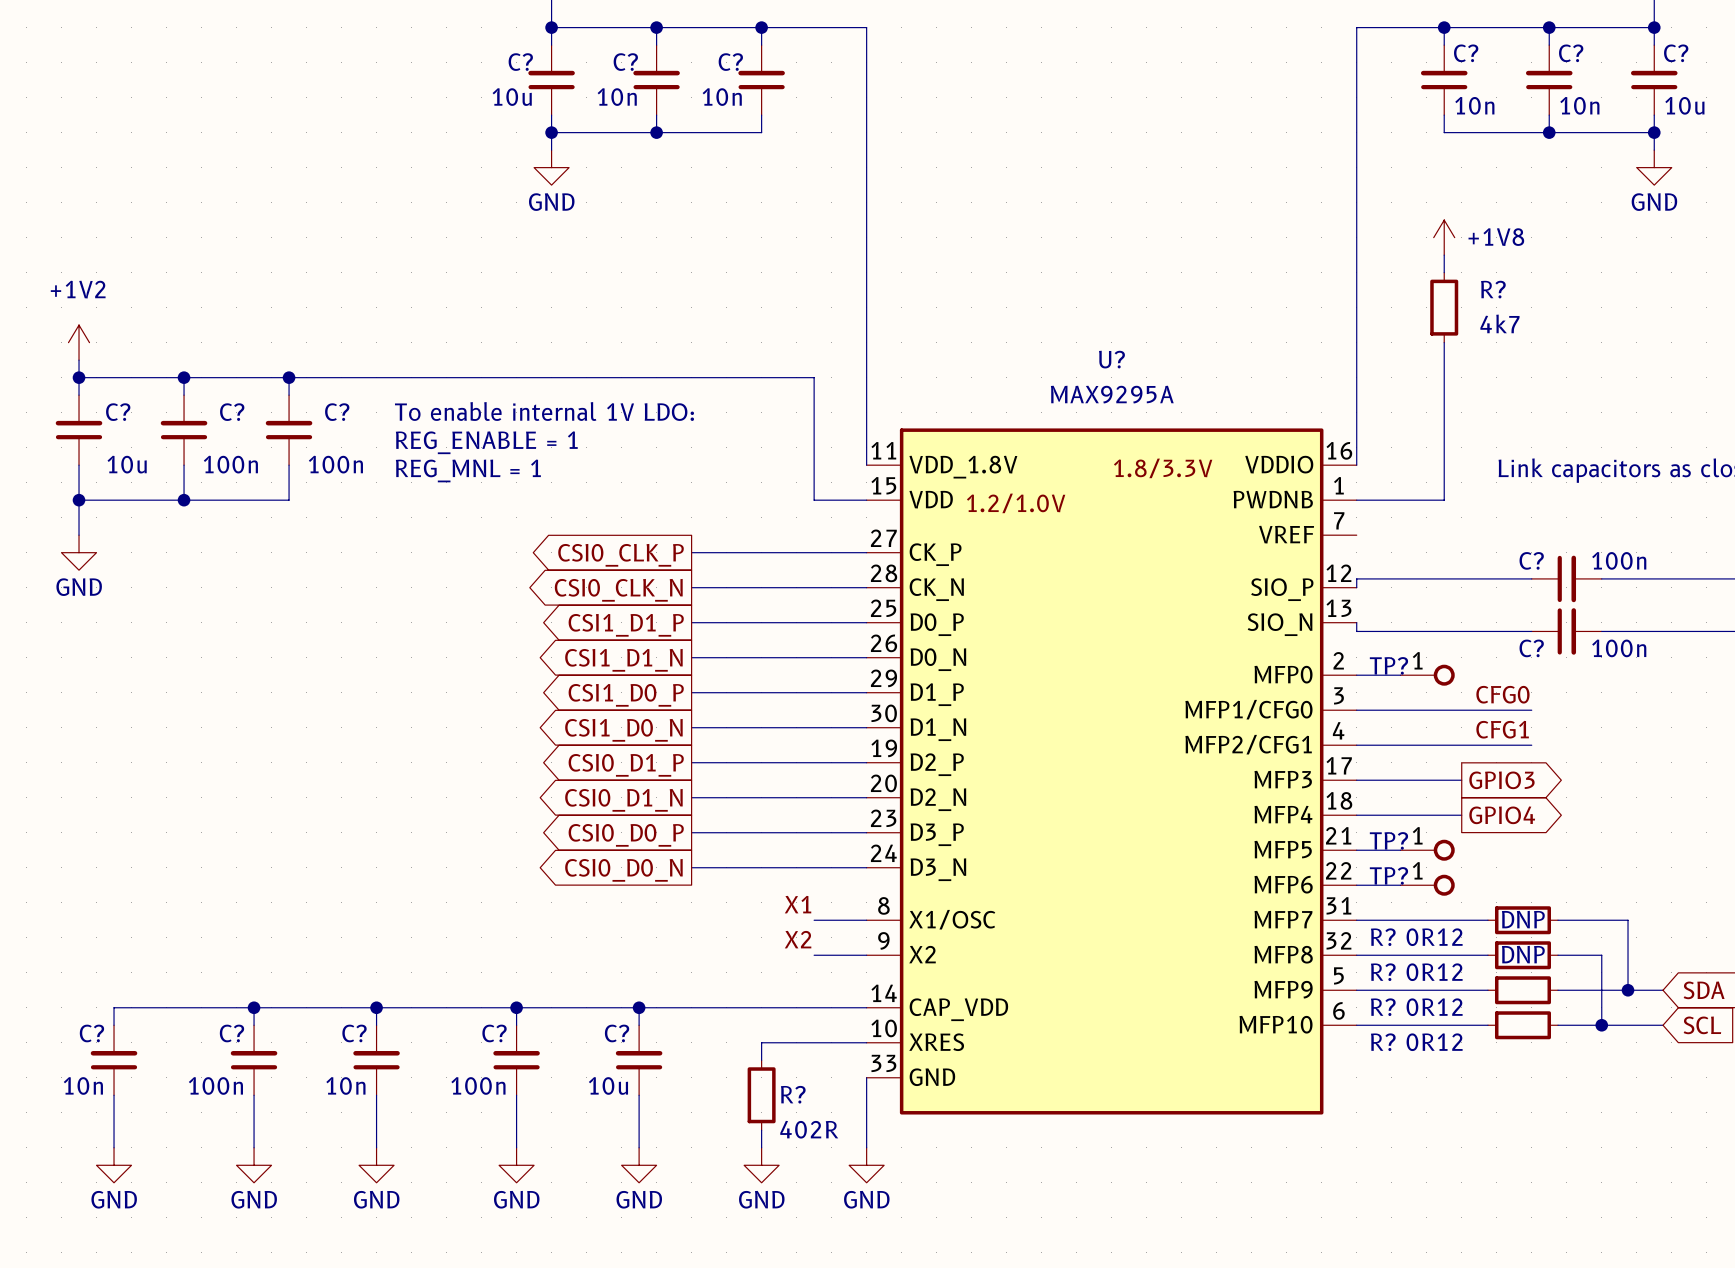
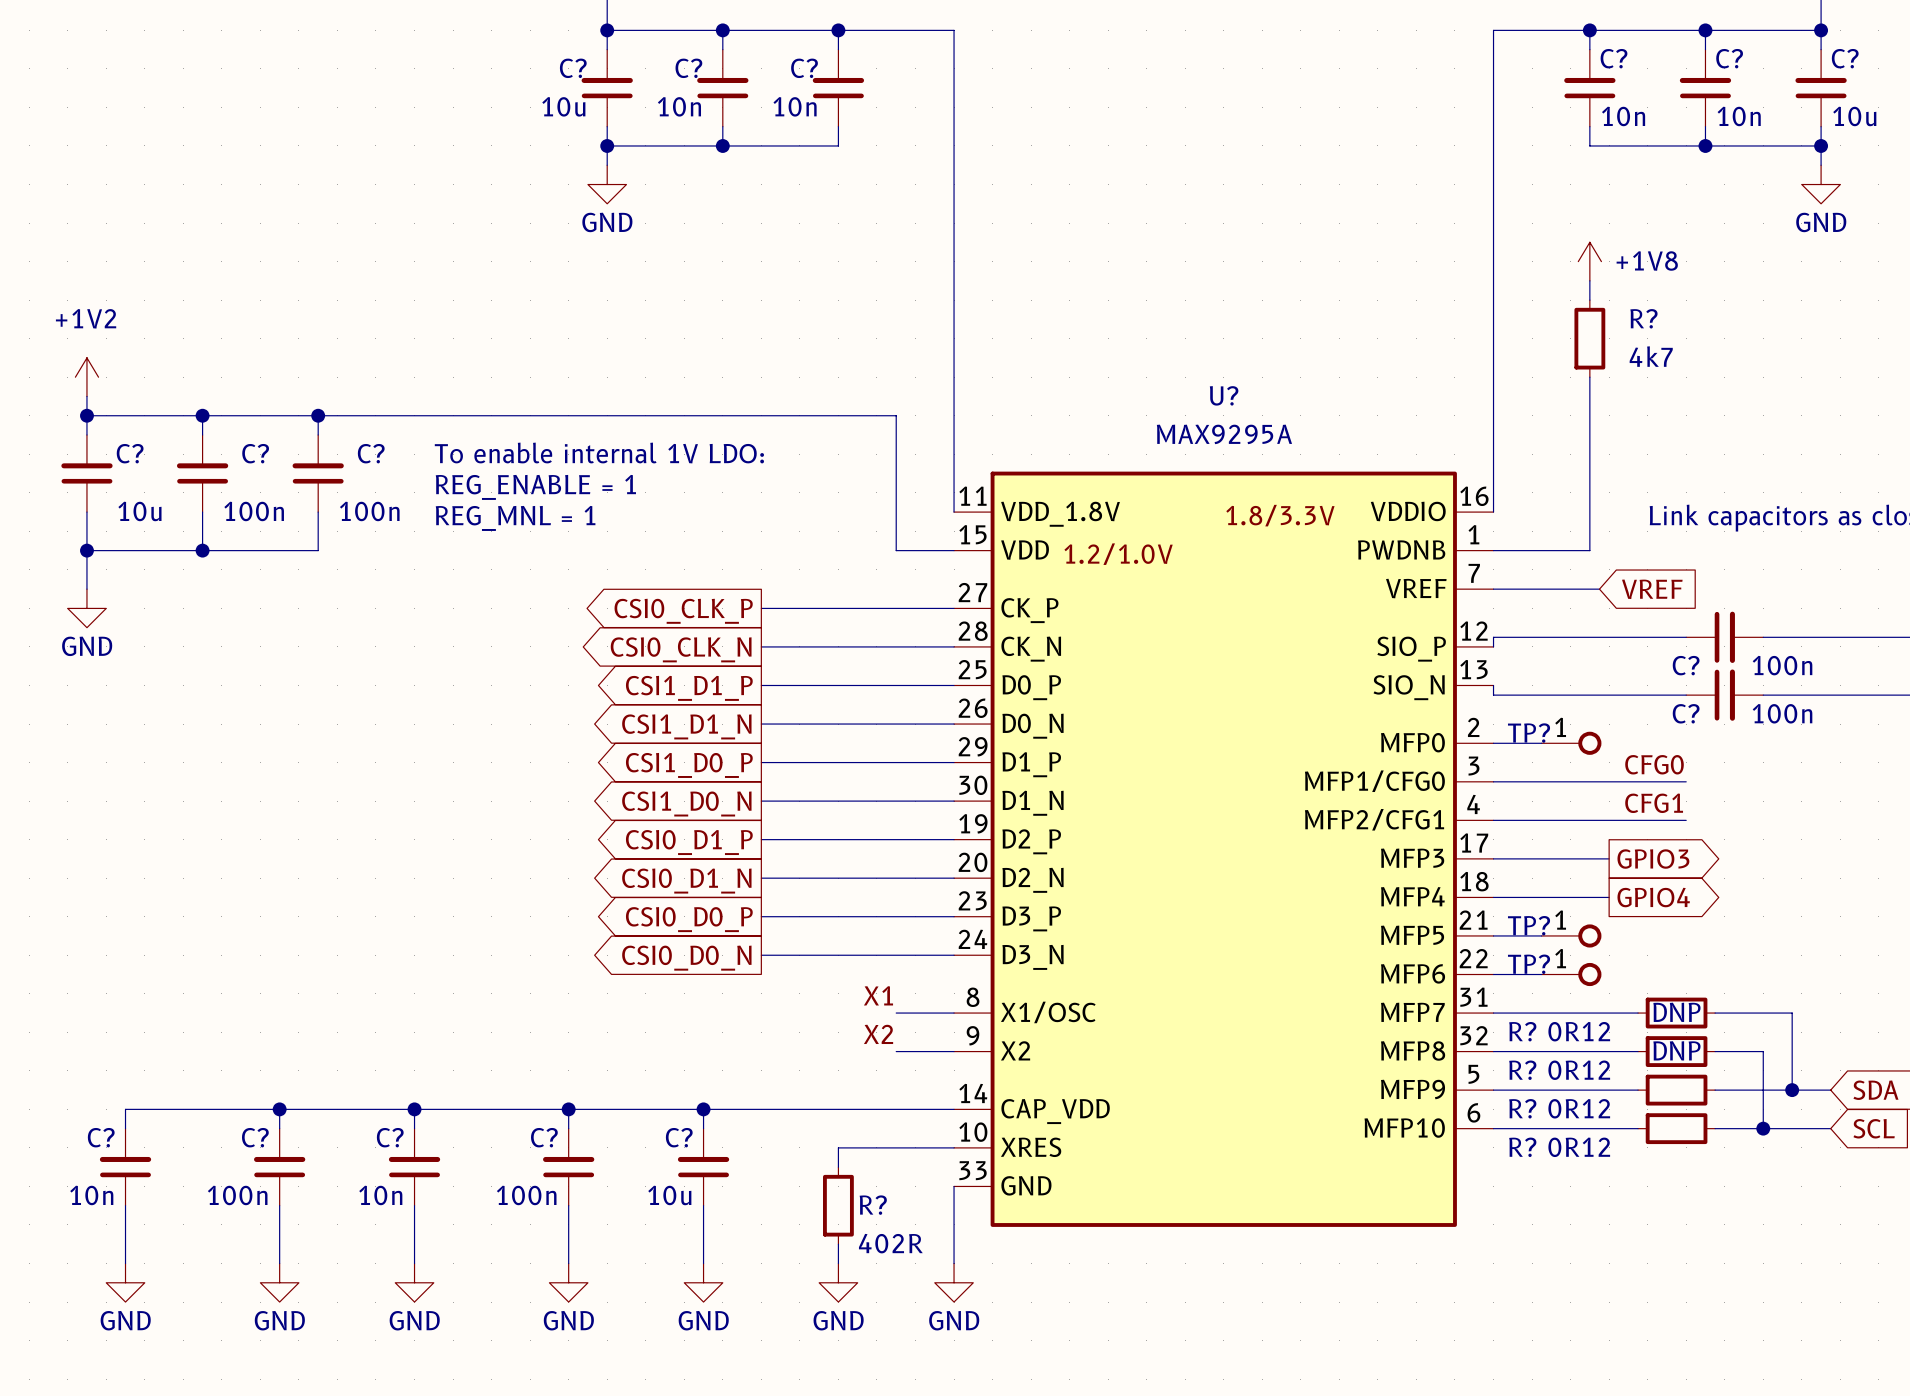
wire: none -> (1493, 589) (1599, 589)
global label: none -> VREF (1652, 589)
C? name position: C? (1531, 560) -> C? (1686, 665)
C? text position: 100n (1619, 560) -> 100n (1782, 665)

